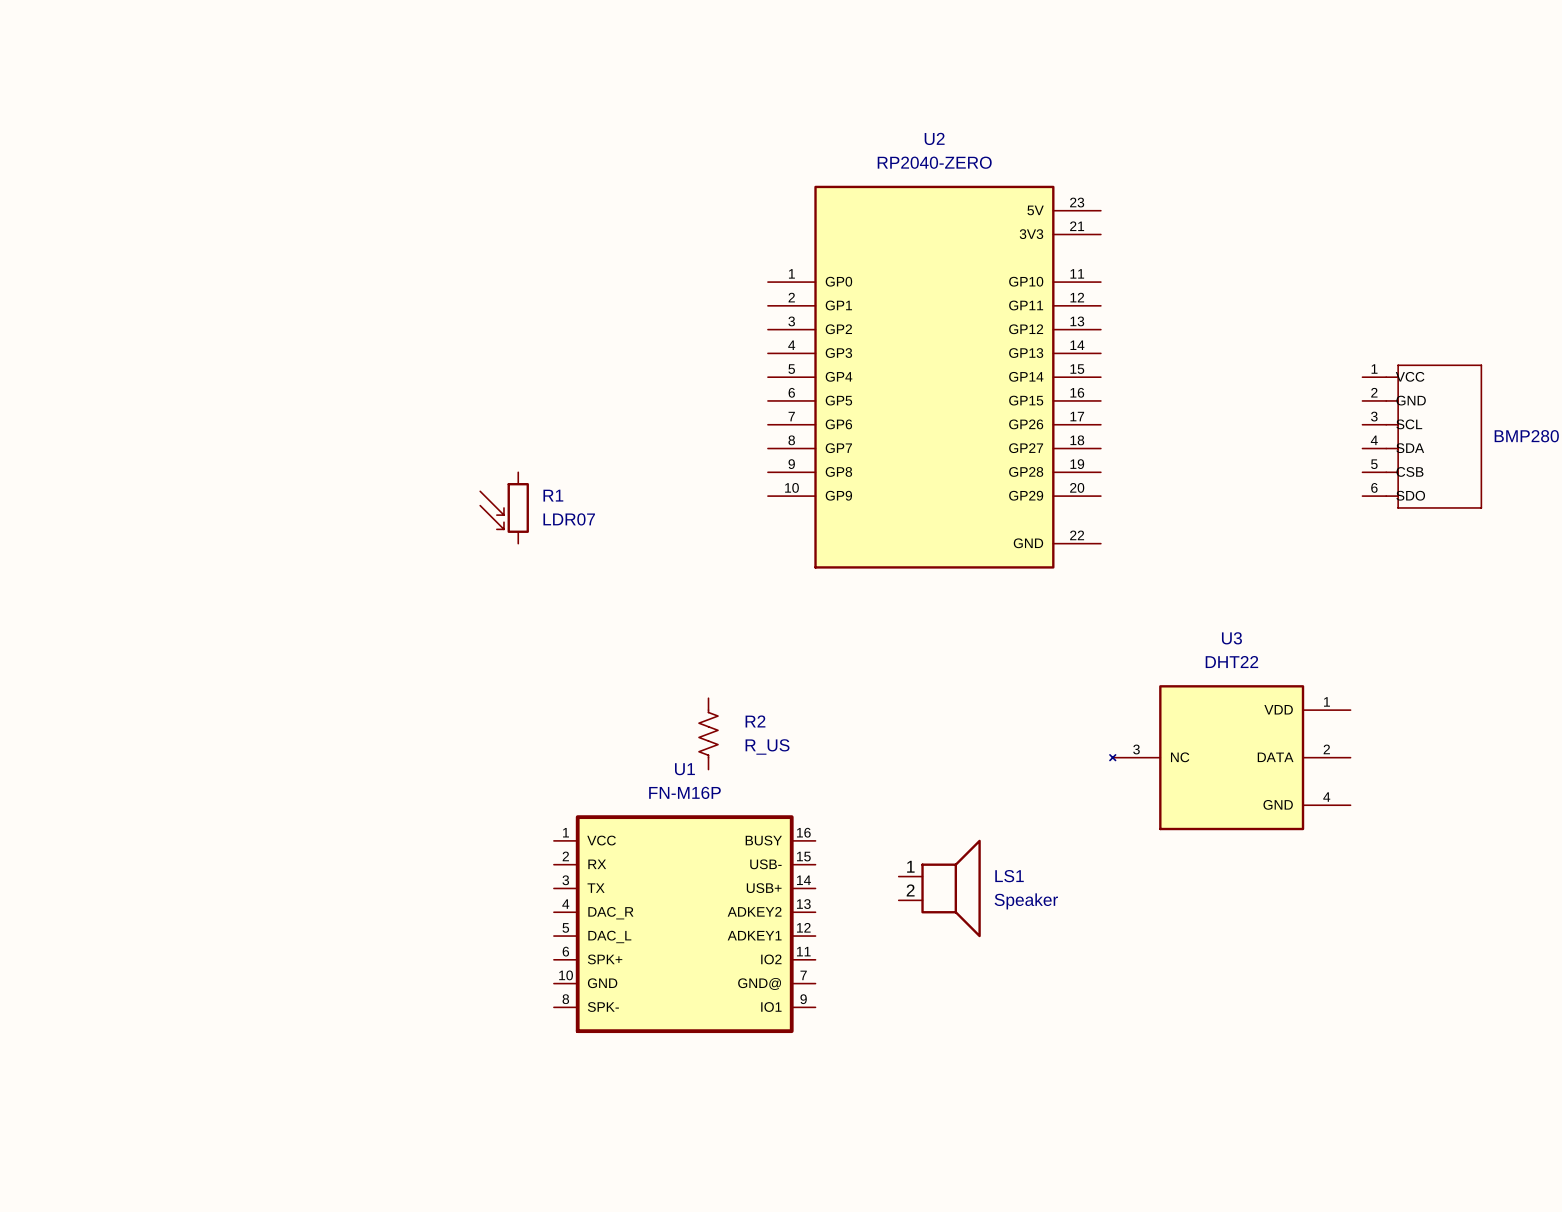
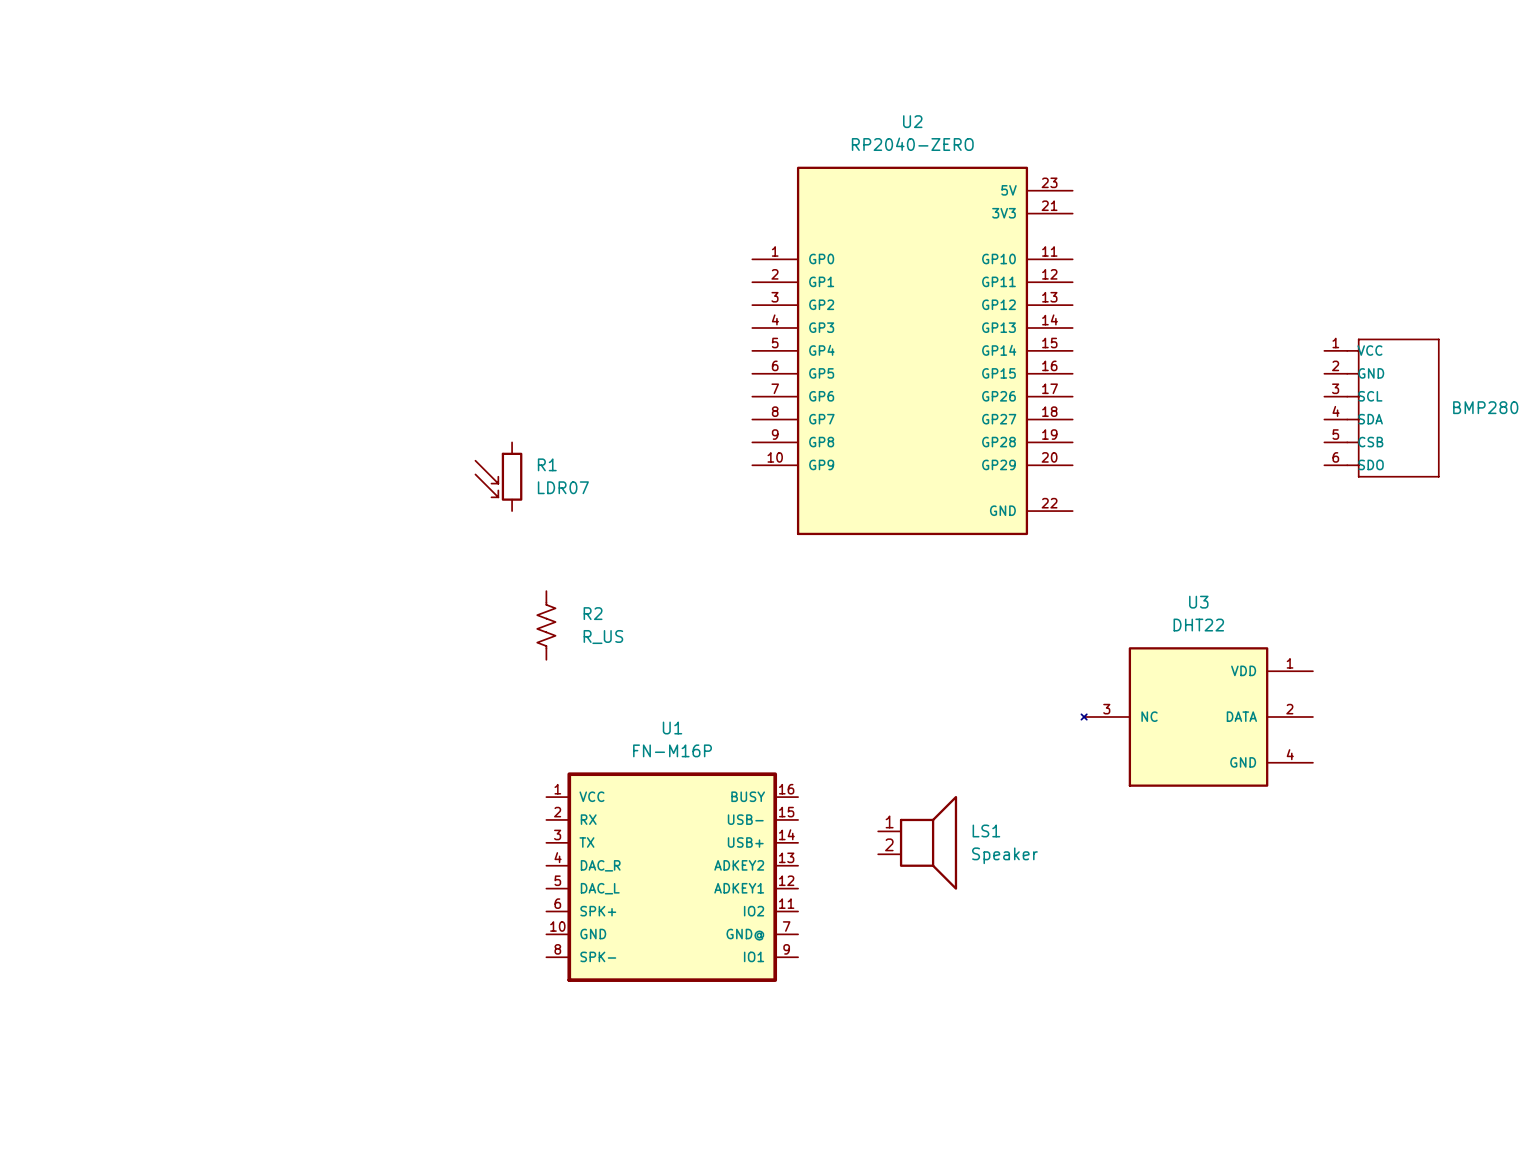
R2 position: (708, 733) -> (546, 625)

